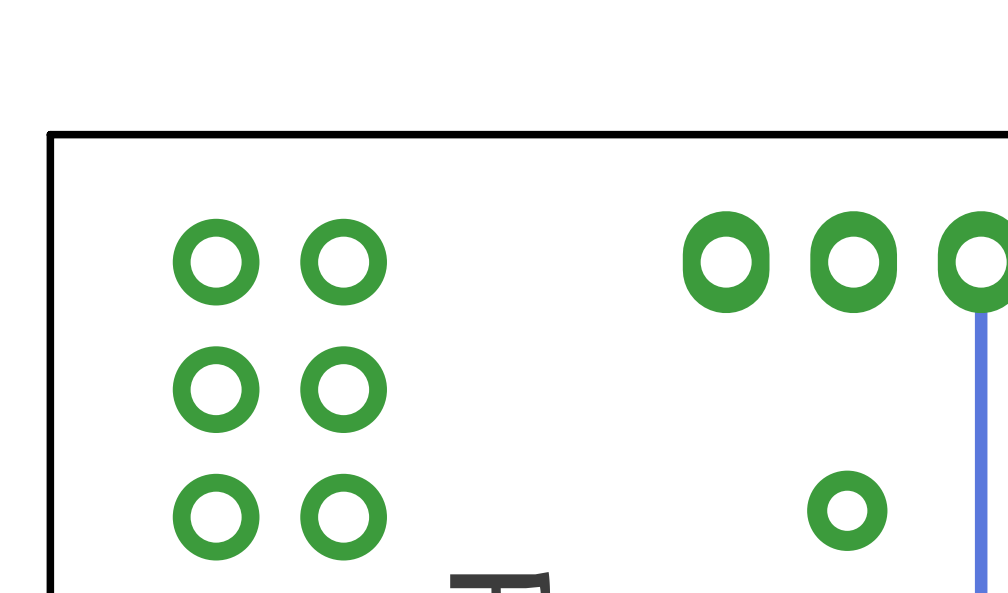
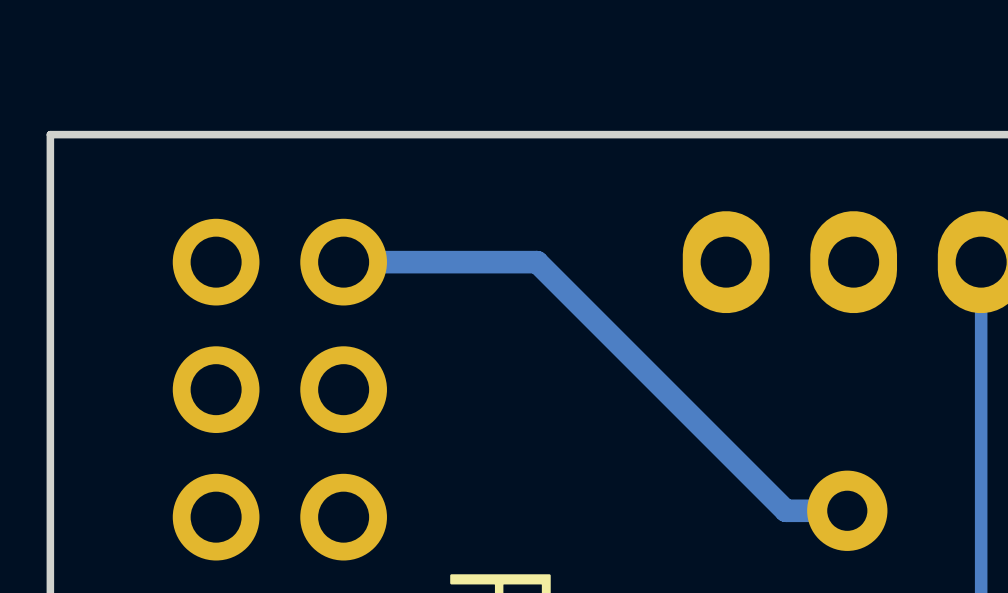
track: none -> (343, 262) (537, 262) (785, 510) (847, 510)

